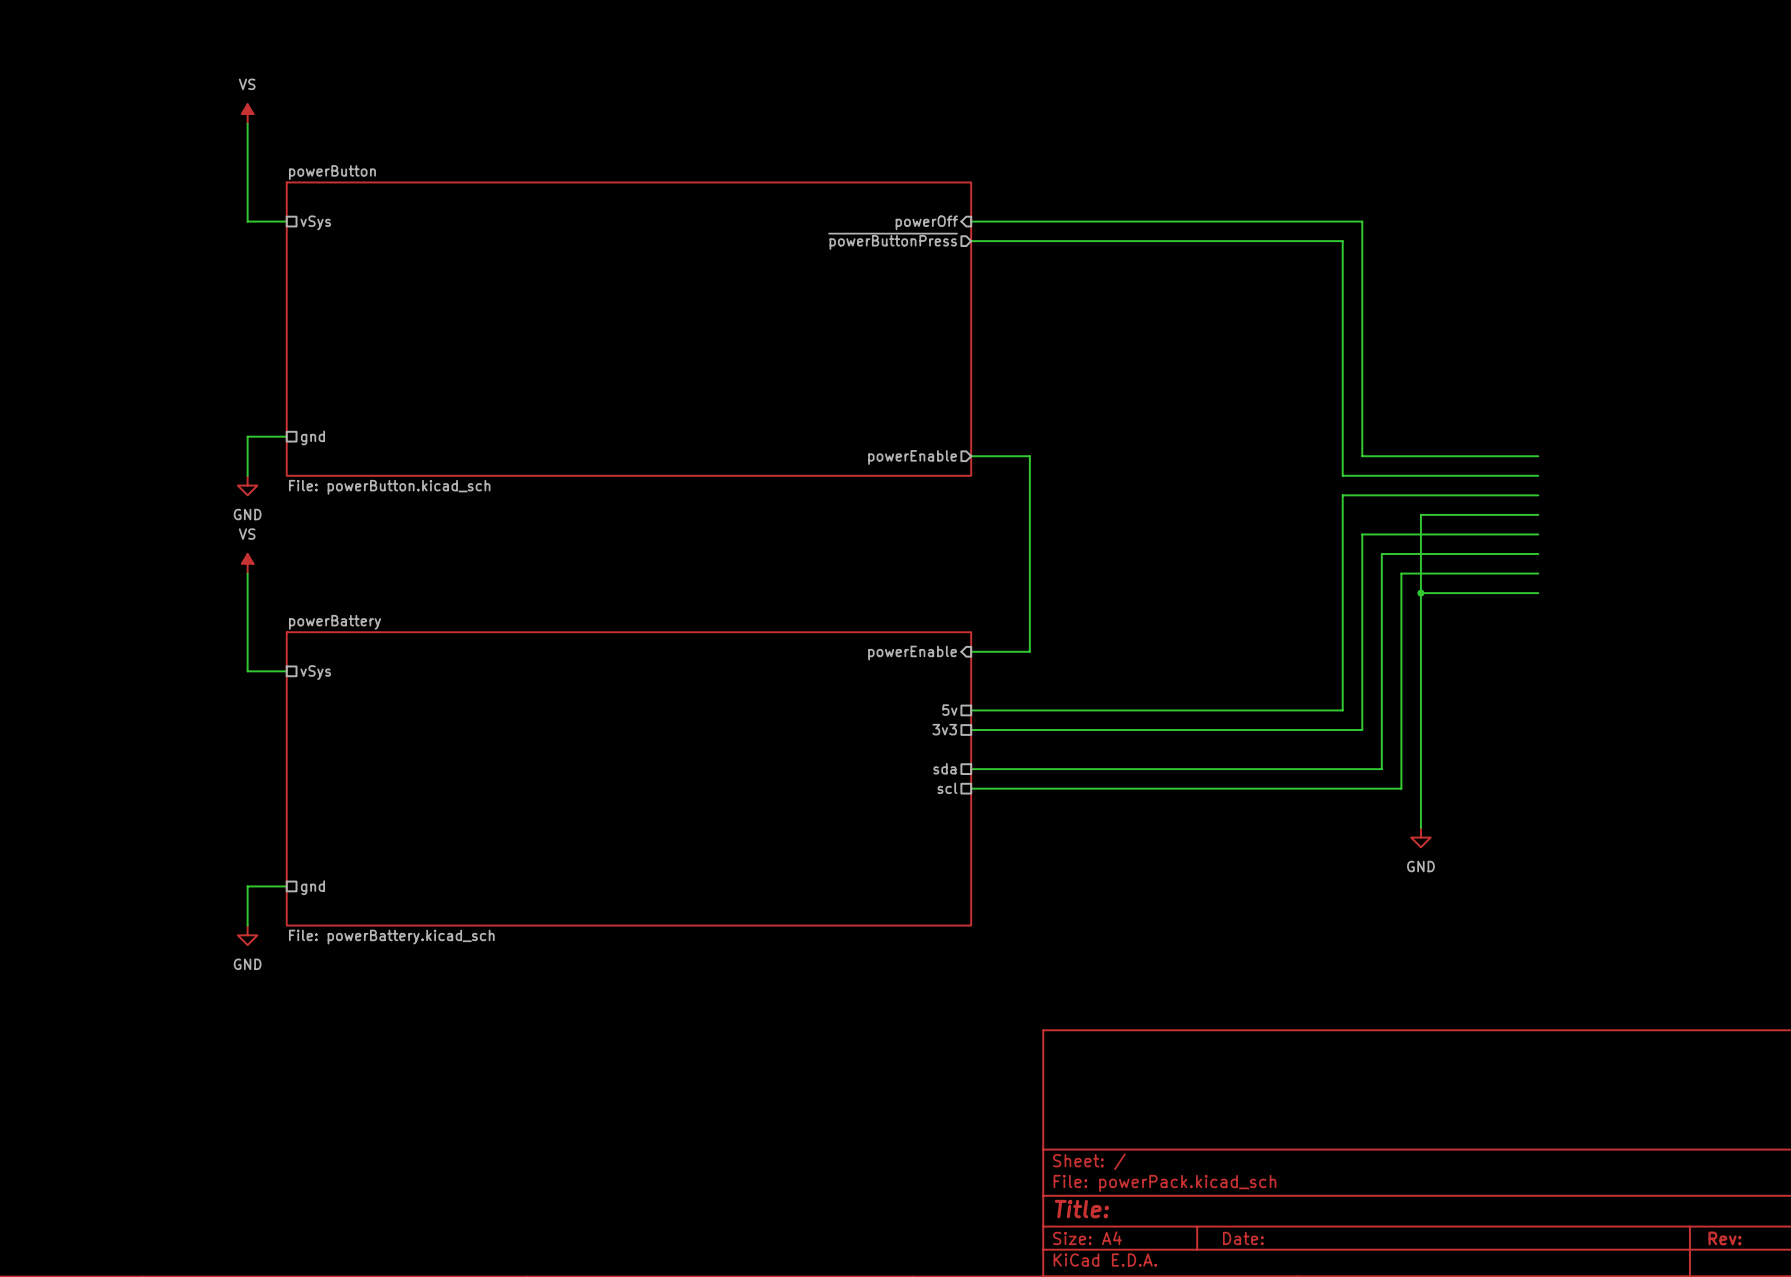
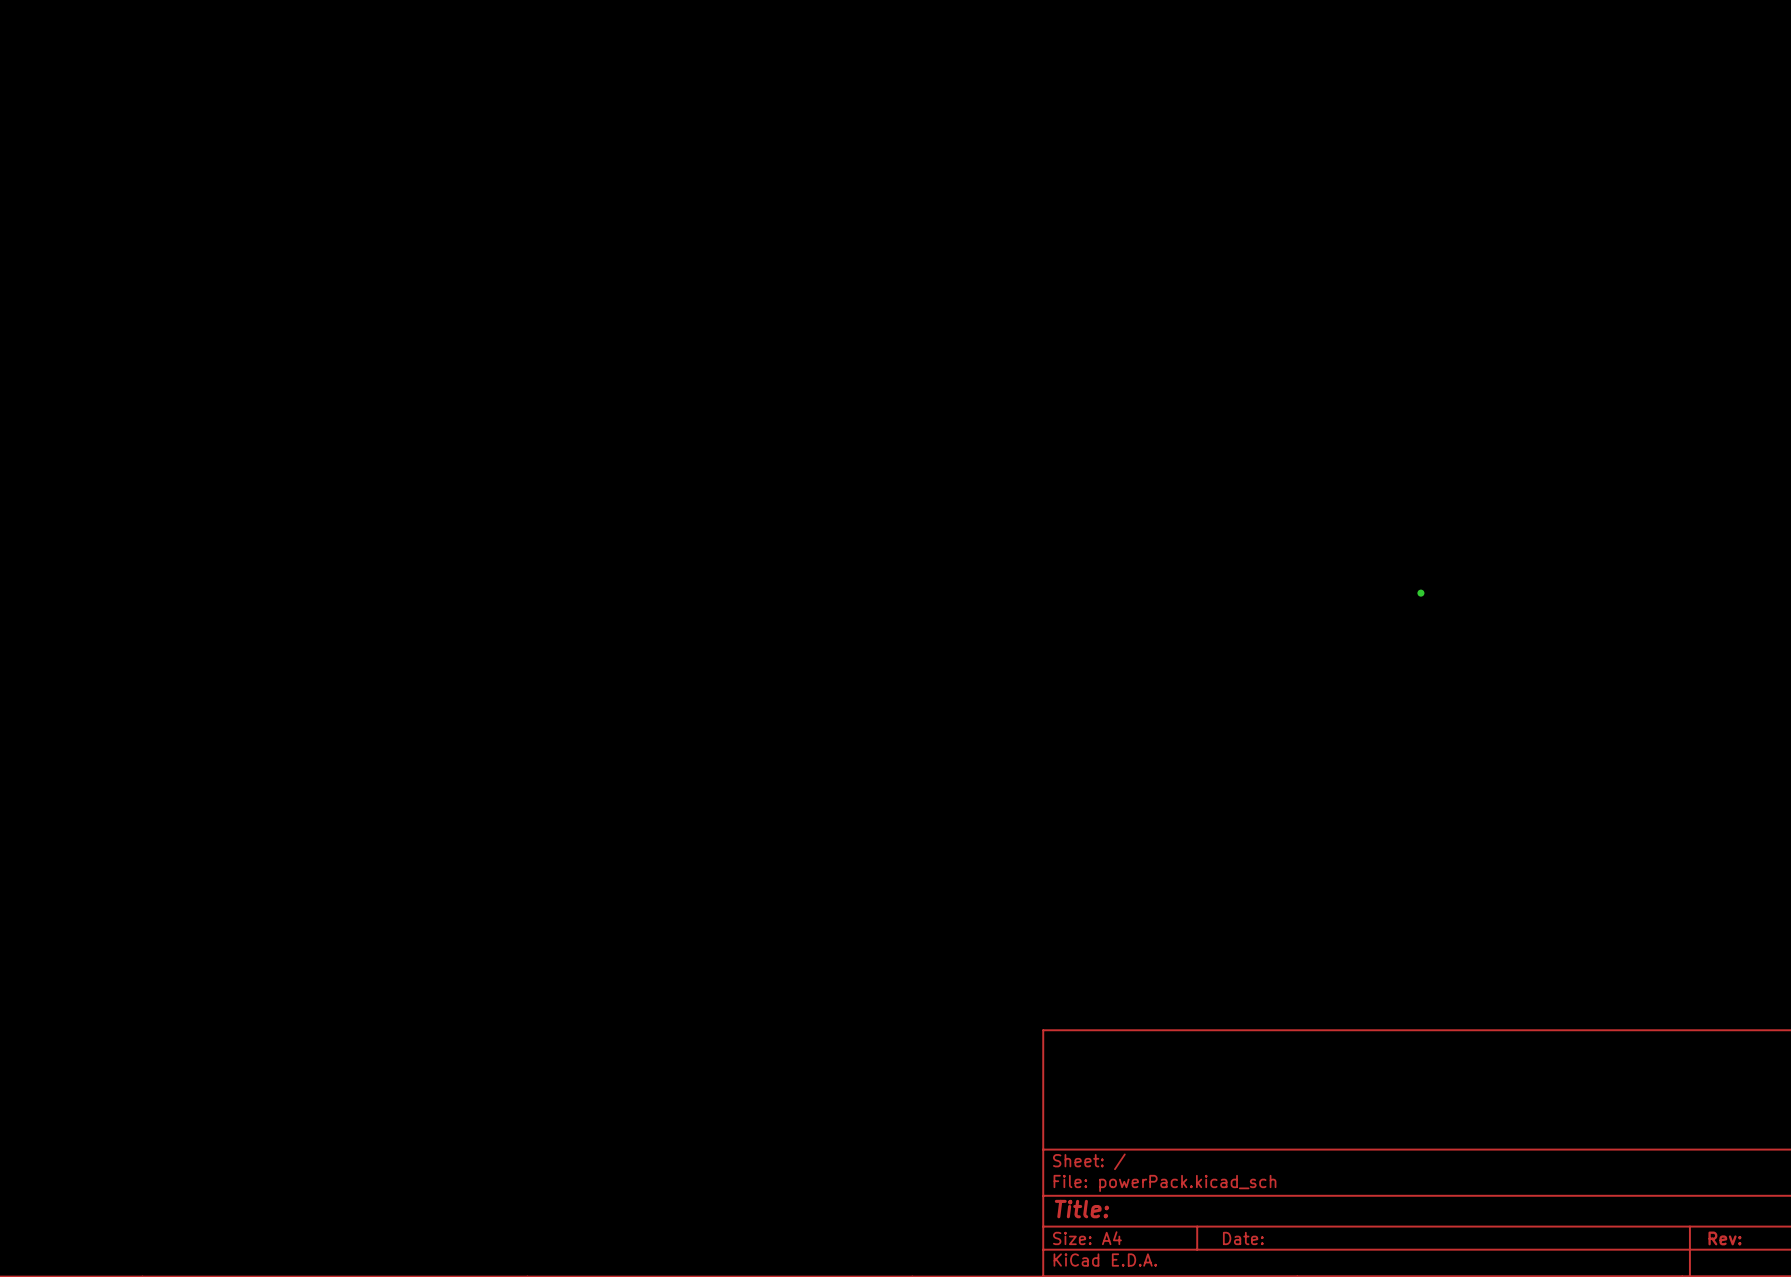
power symbol: VS (247, 114) -> none
wire: (247, 123) (247, 221) (286, 221) -> none
wire: (971, 221) (1362, 221) (1362, 456) (1538, 456) -> none
sheet pin: vSys (315, 222) -> none
sheet pin: powerOff (926, 222) -> none
sheet pin: ~{powerButtonPress} (893, 241) -> none
wire: (971, 241) (1342, 241) (1342, 475) (1538, 475) -> none
sheet powerButton: File: powerButton.kicad_sch (628, 329) -> none
wire: (286, 436) (247, 436) (247, 475) -> none
sheet pin: gnd (312, 437) -> none
wire: (971, 456) (1029, 456) (1029, 651) (971, 651) -> none
sheet pin: powerEnable (912, 457) -> none
power symbol: GND (247, 485) -> none
wire: (1538, 495) (1342, 495) (1342, 710) (971, 710) -> none
wire: (1538, 514) (1420, 514) (1420, 827) -> none
wire: (1538, 534) (1362, 534) (1362, 730) (971, 730) -> none
wire: (1538, 554) (1381, 554) (1381, 769) (971, 769) -> none
power symbol: VS (247, 563) -> none
wire: (247, 573) (247, 671) (286, 671) -> none
wire: (1538, 573) (1401, 573) (1401, 788) (971, 788) -> none
wire: (1420, 593) (1538, 593) -> none
sheet pin: powerEnable (912, 653) -> none
sheet pin: vSys (315, 672) -> none
sheet pin: 5v (949, 710) -> none
sheet pin: 3v3 (944, 729) -> none
sheet pin: sda (944, 768) -> none
sheet powerBattery: File: powerBattery.kicad_sch (628, 778) -> none
sheet pin: scl (947, 788) -> none
power symbol: GND (1420, 837) -> none
wire: (286, 886) (247, 886) (247, 925) -> none
sheet pin: gnd (312, 887) -> none
power symbol: GND (247, 935) -> none

